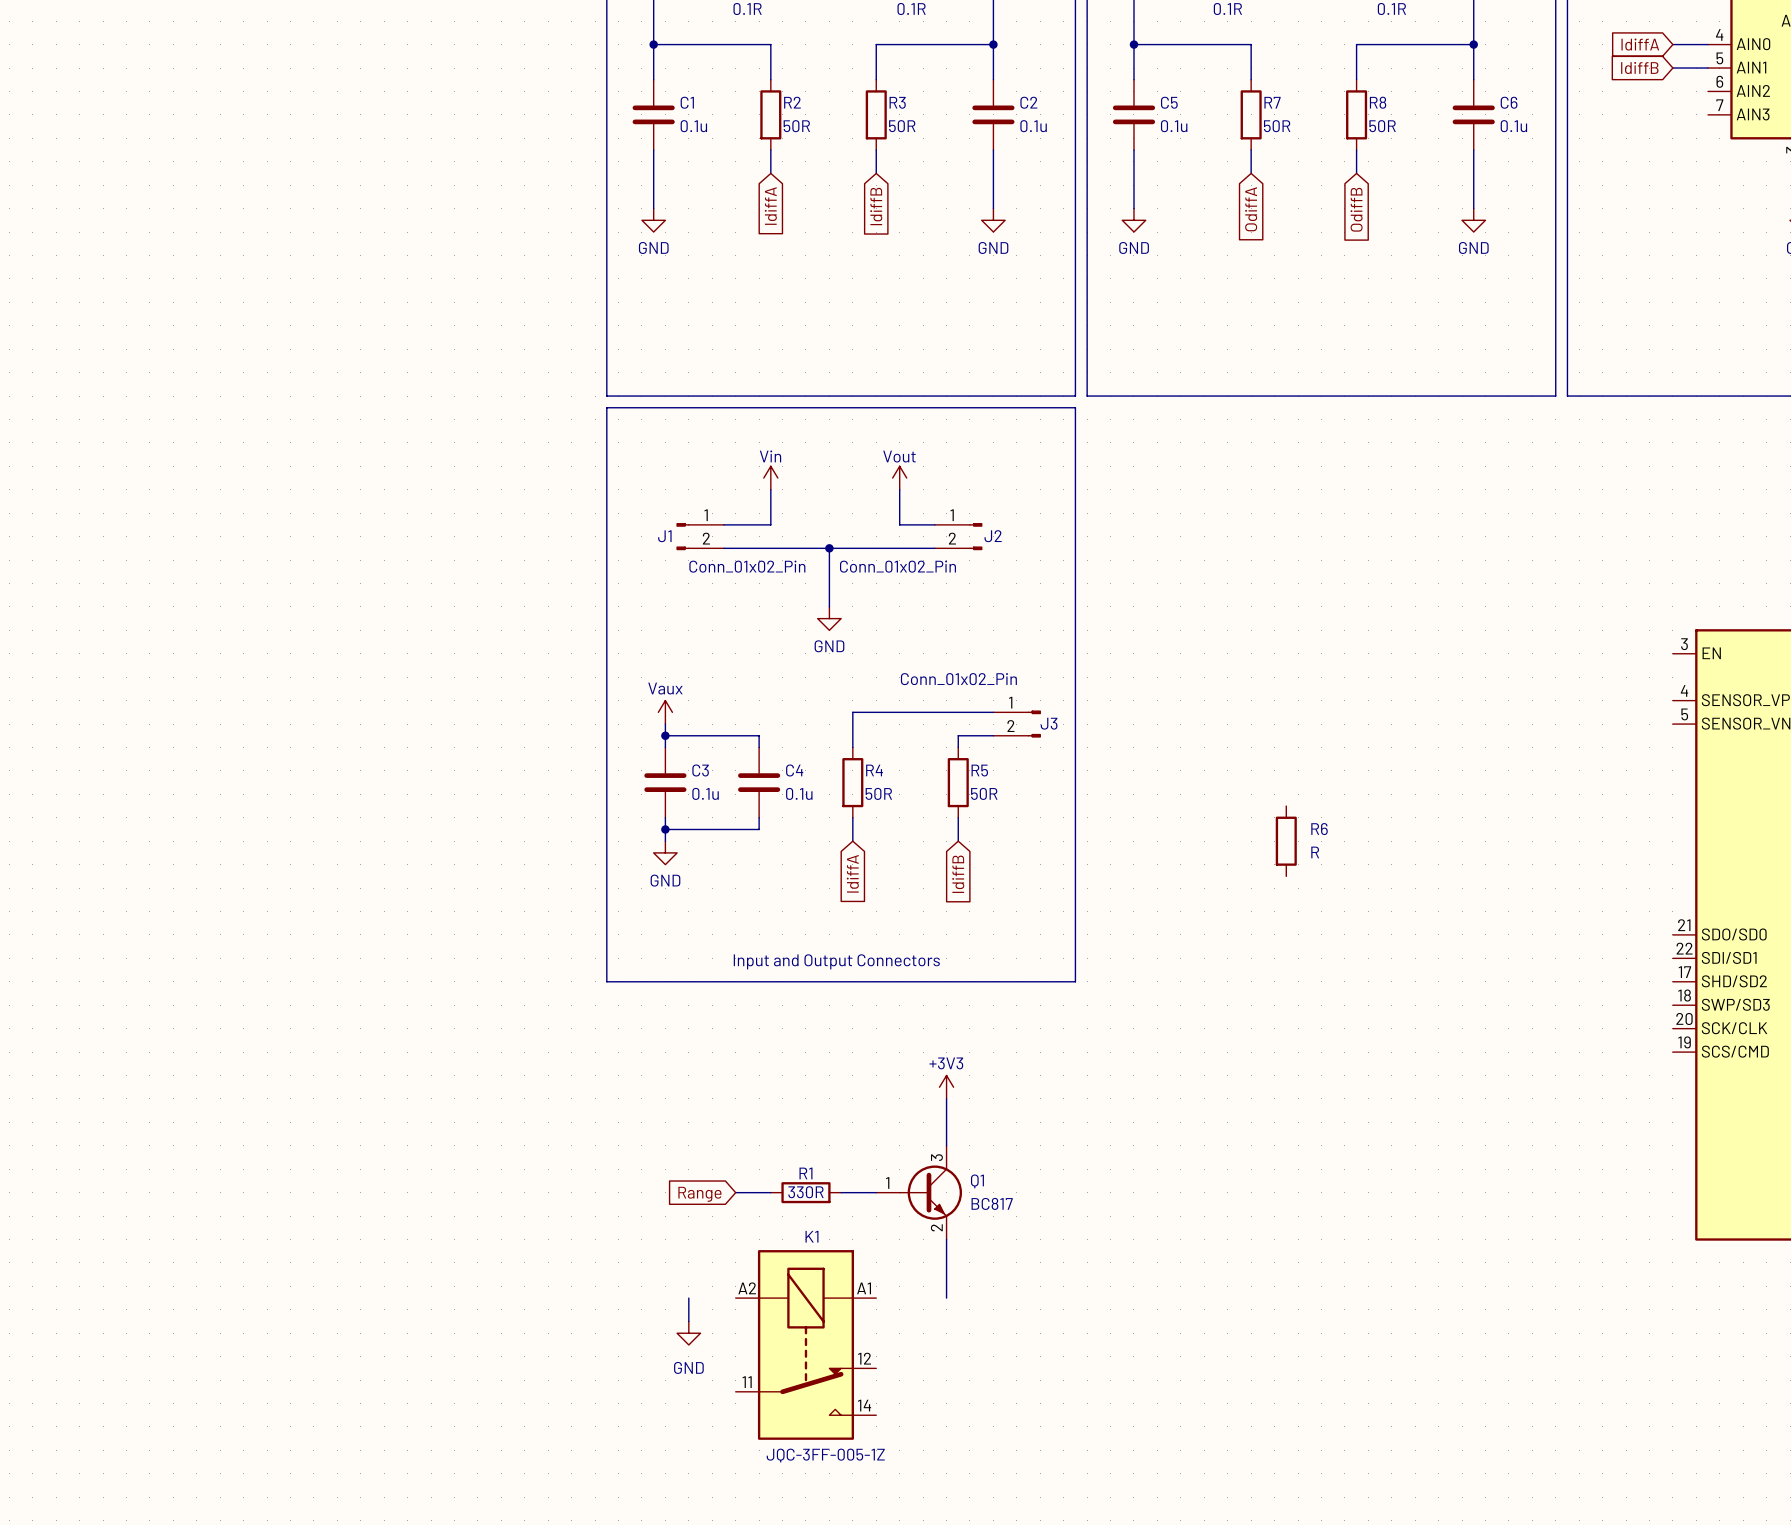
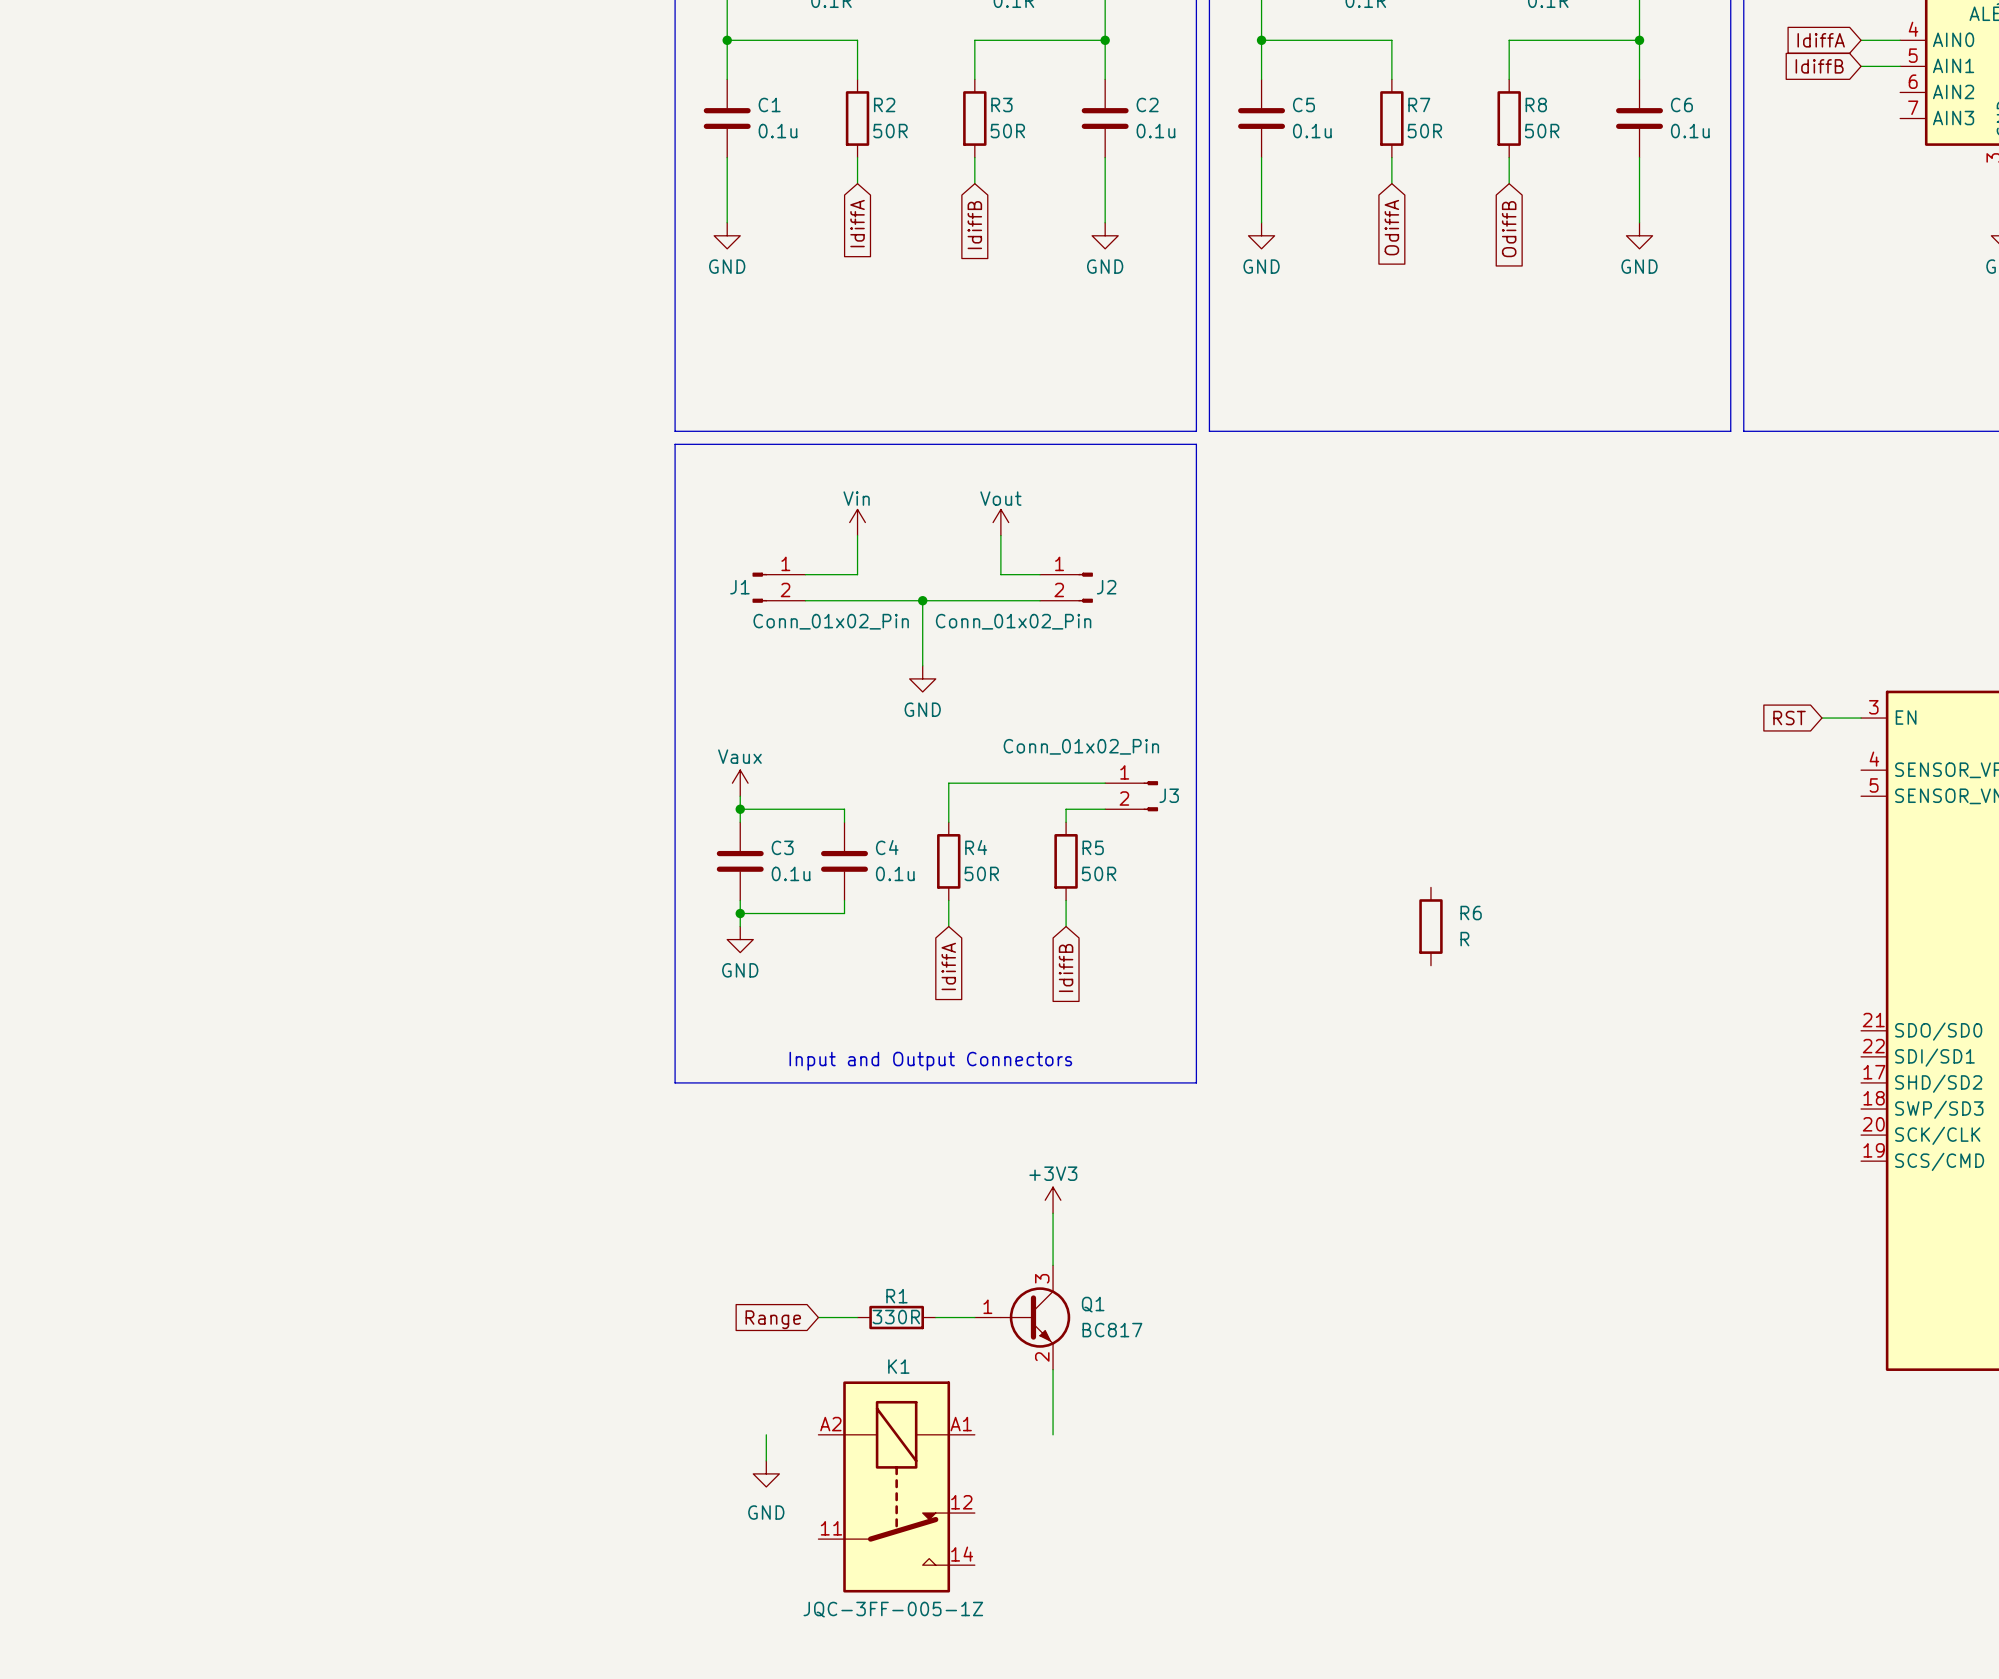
global label: none -> RST (1789, 718)
wire: none -> (1821, 718) (1861, 718)

